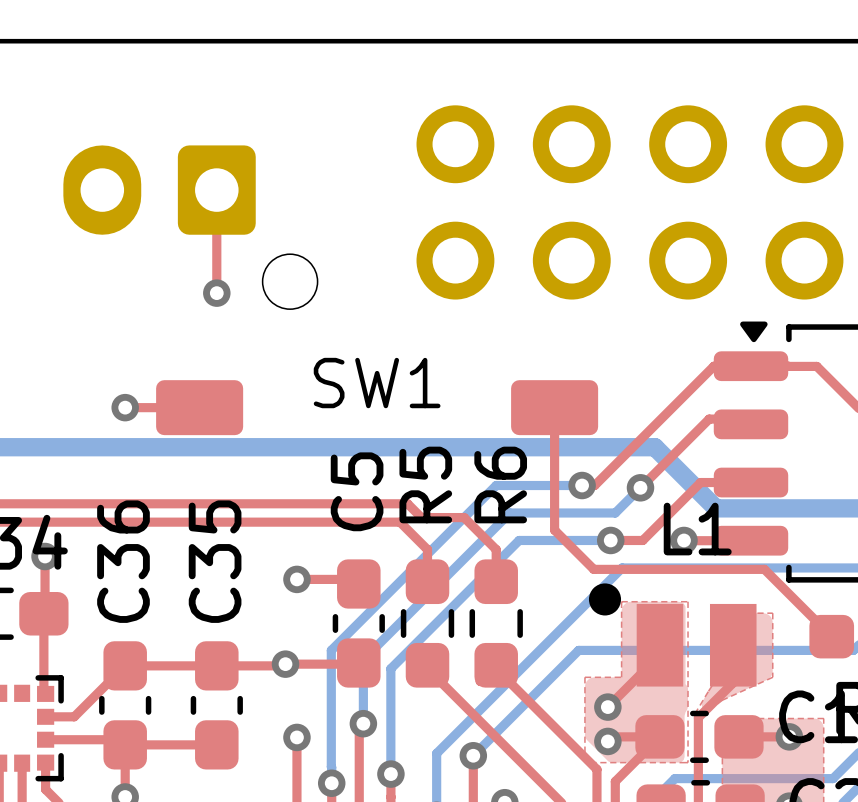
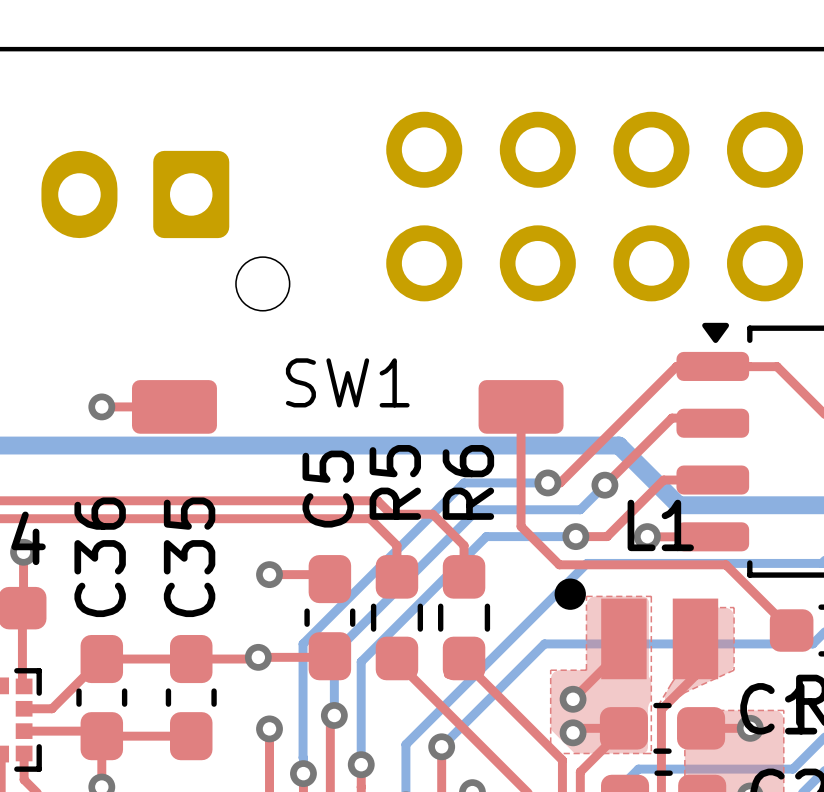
top track: (216, 190) (216, 293) -> none
via: (216, 293) -> none

